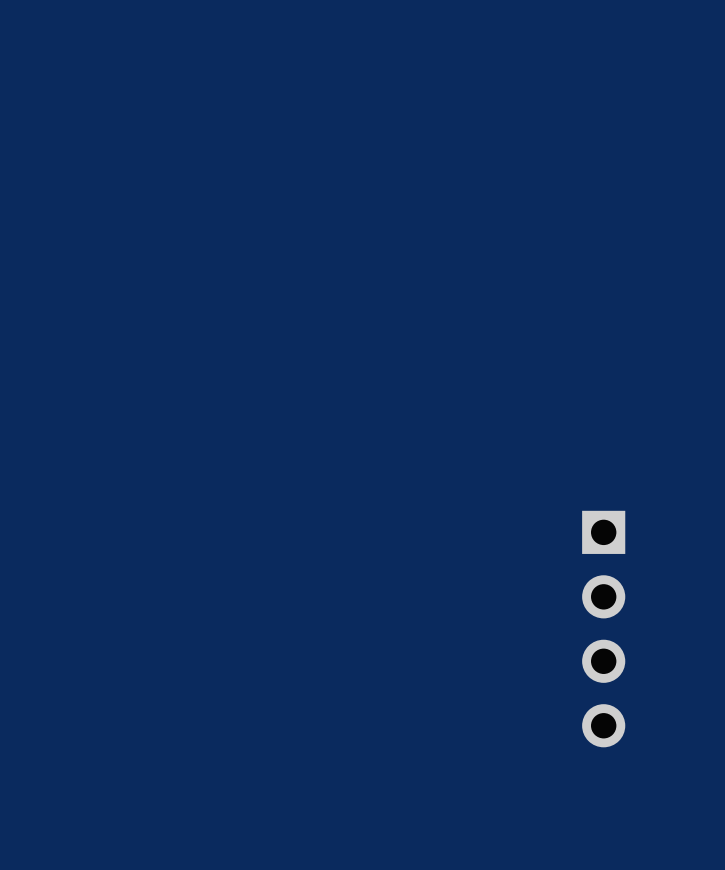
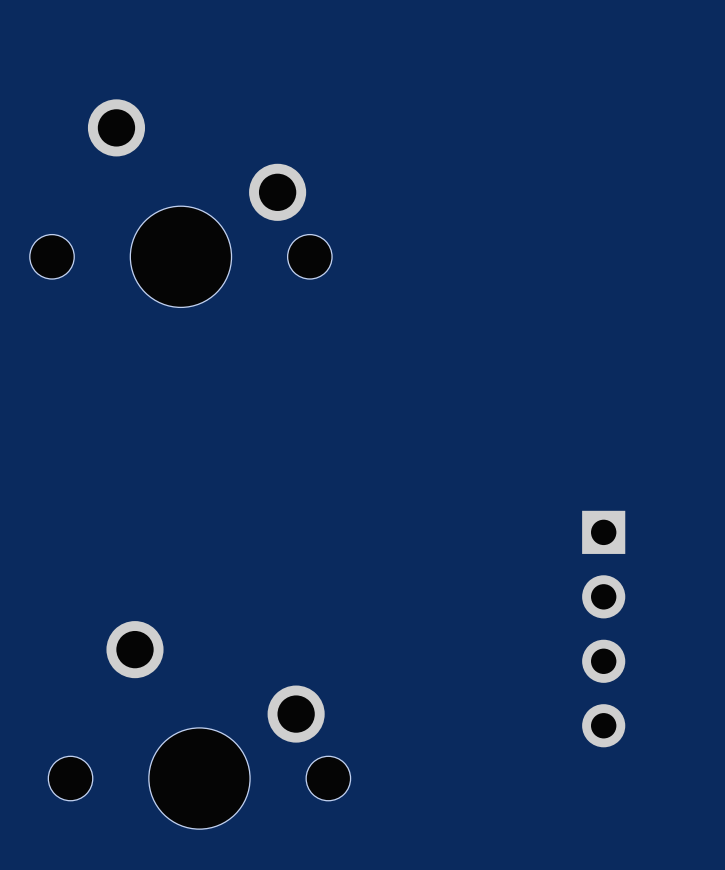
part: none -> (180, 203)
part: none -> (199, 725)

